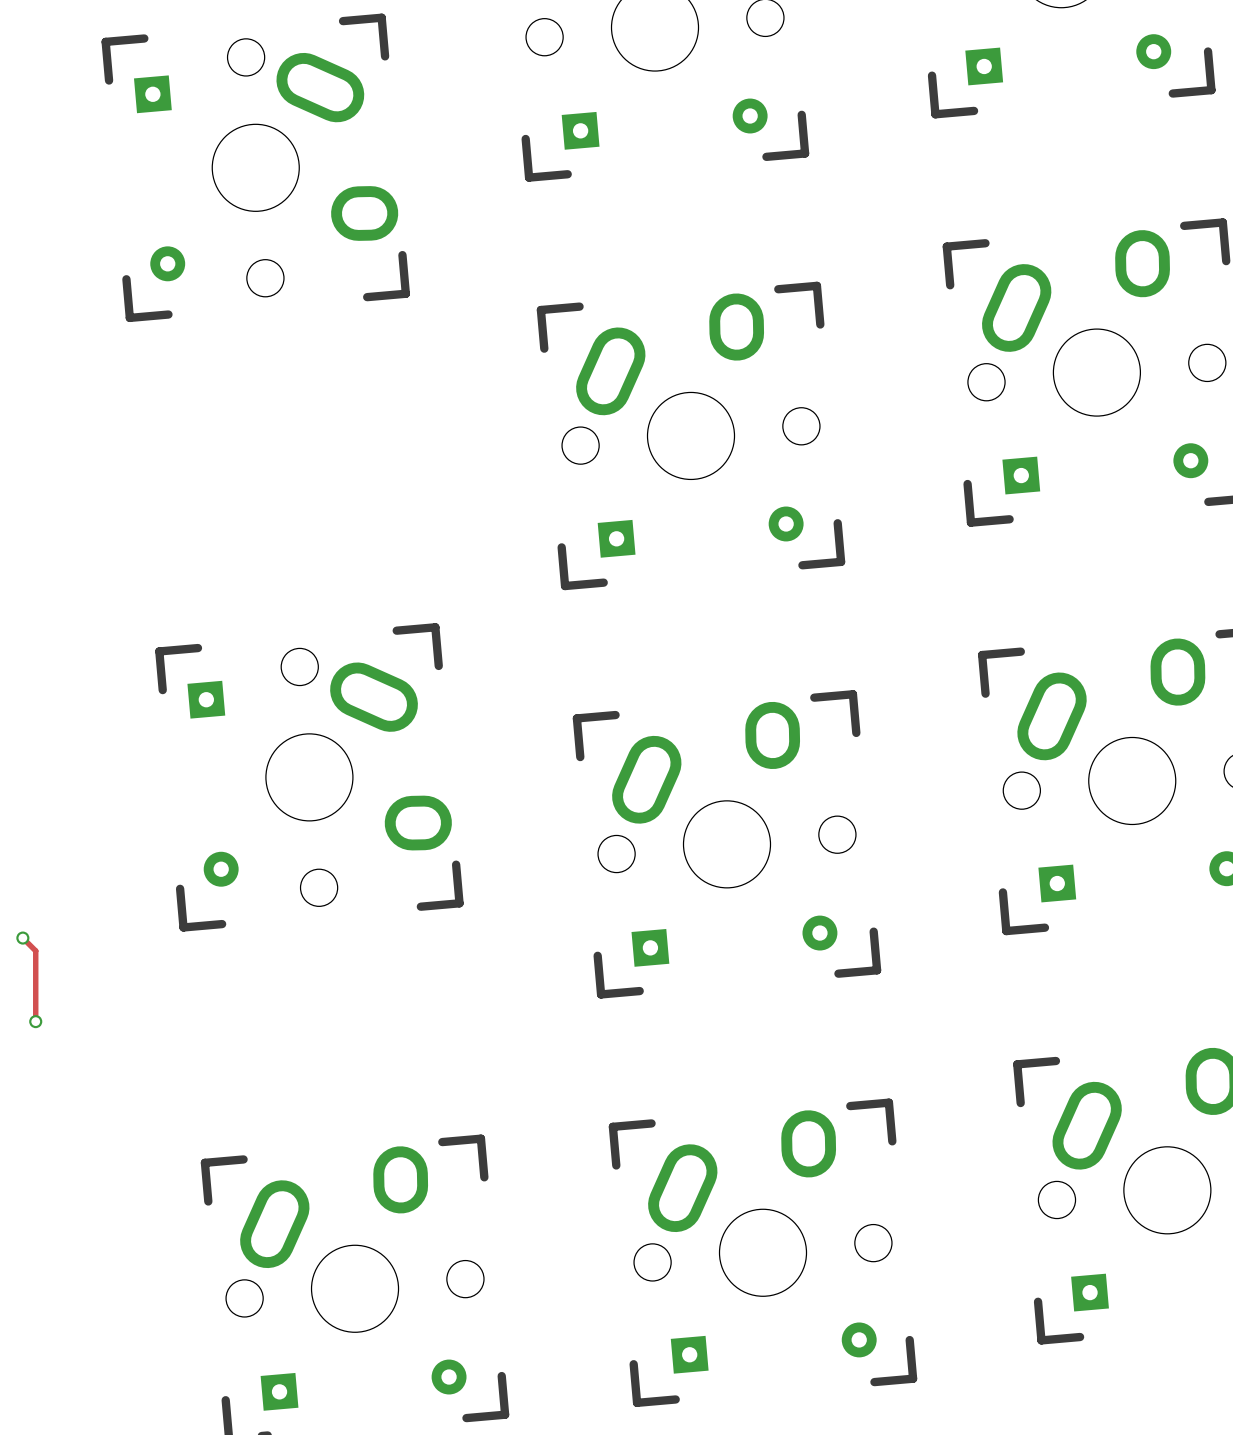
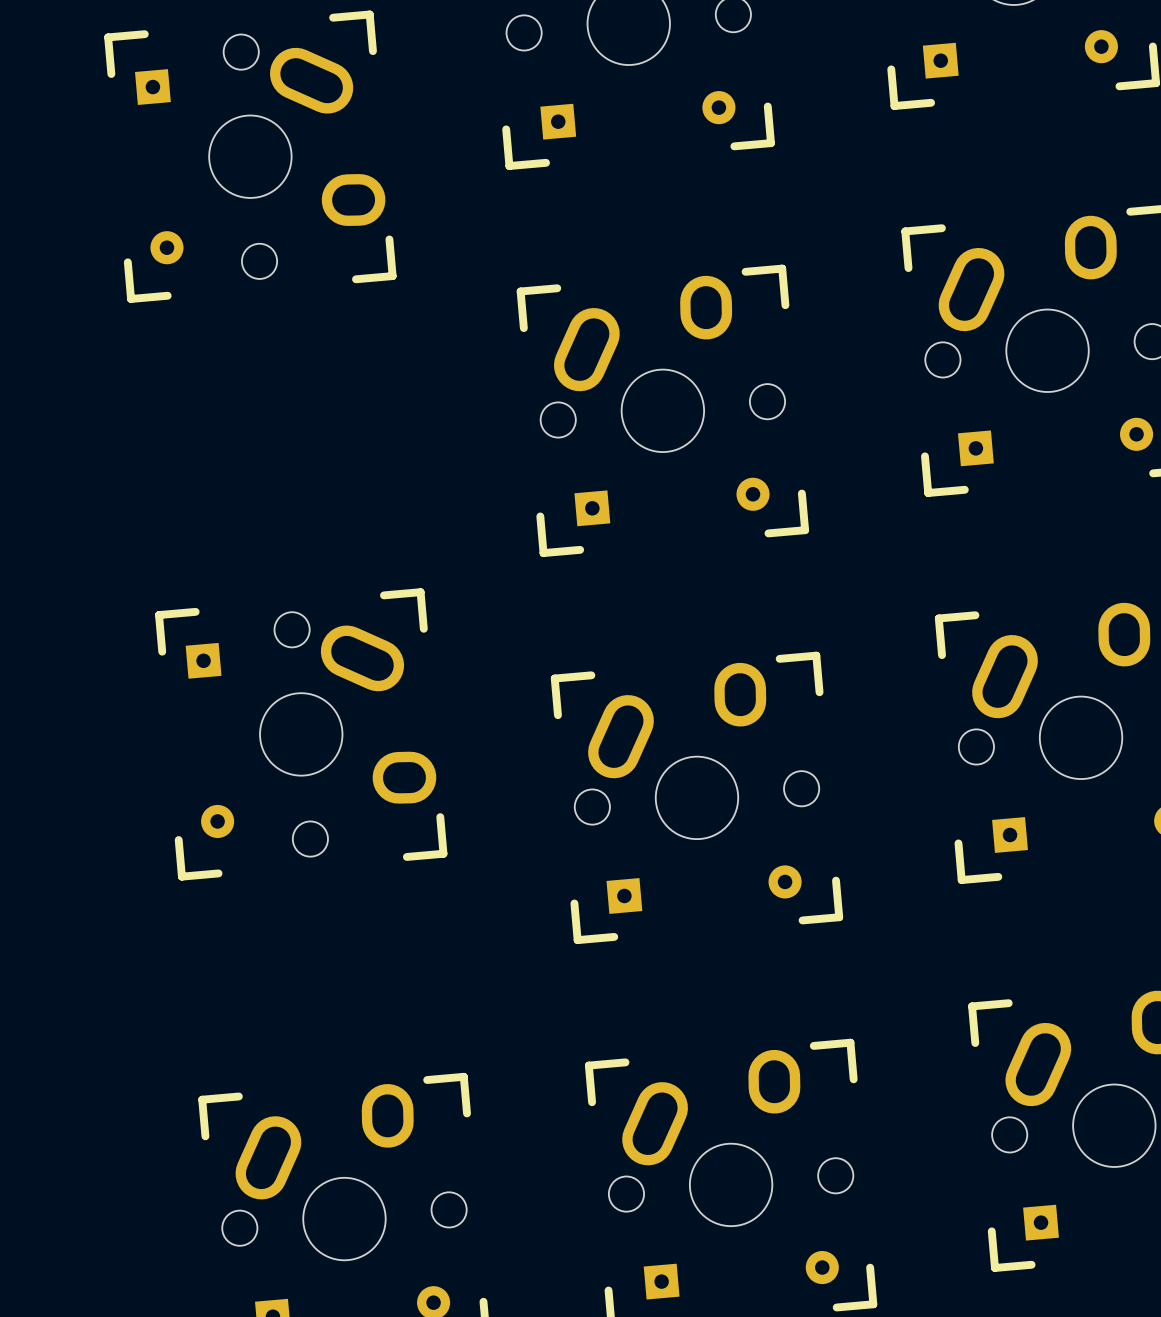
track: (22, 938) (35, 950) (35, 1021) -> none
via: (22, 938) -> none
via: (35, 1021) -> none

